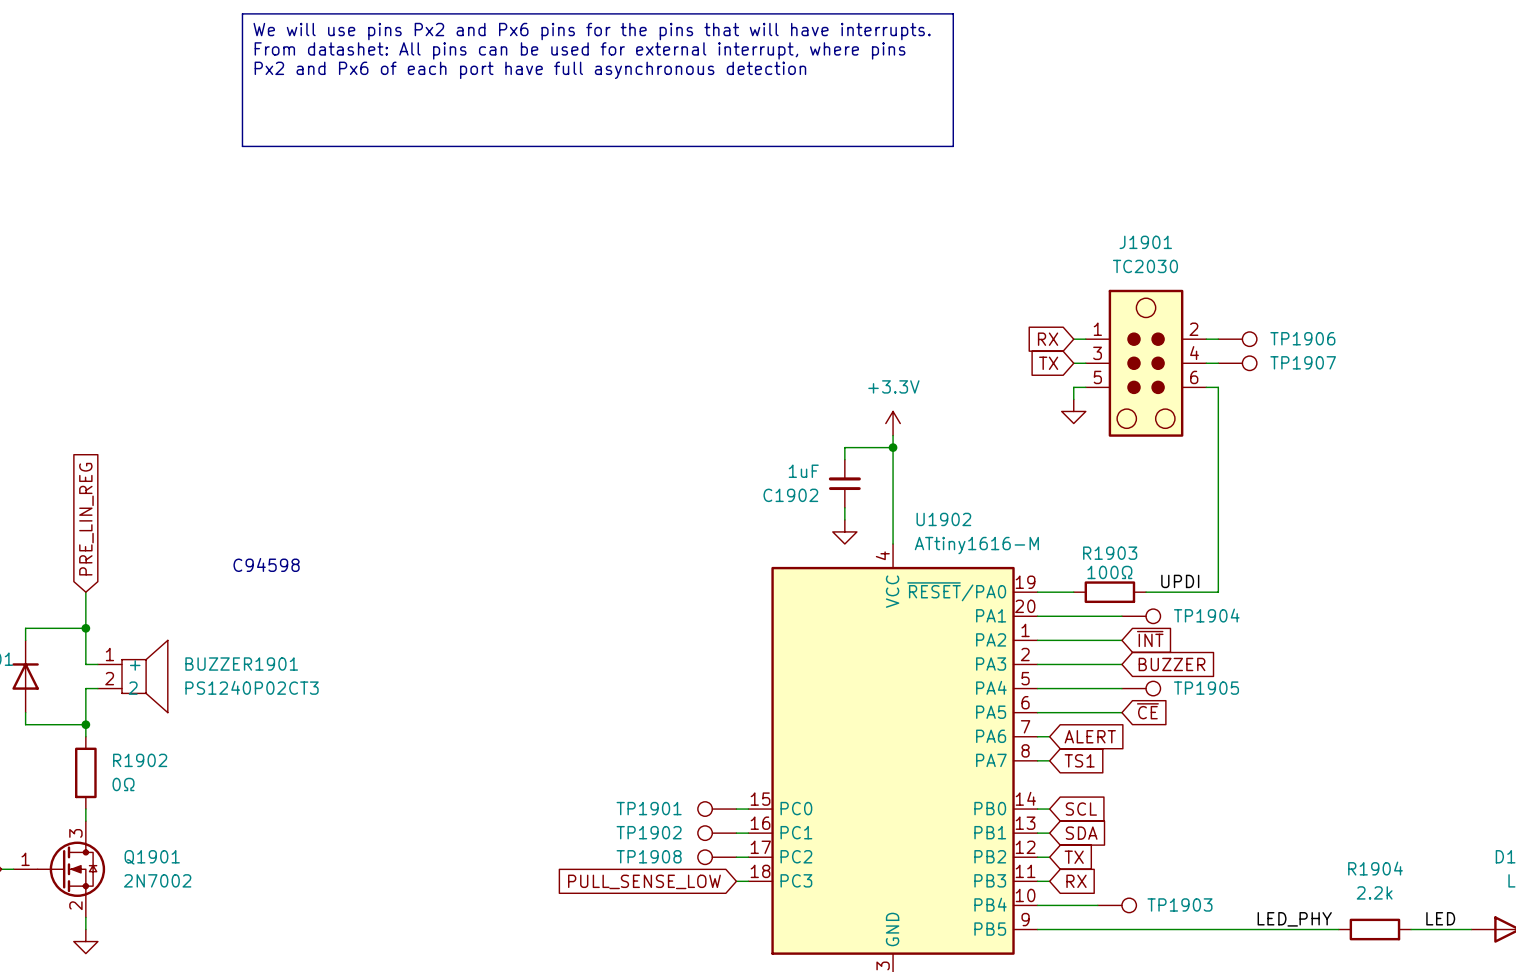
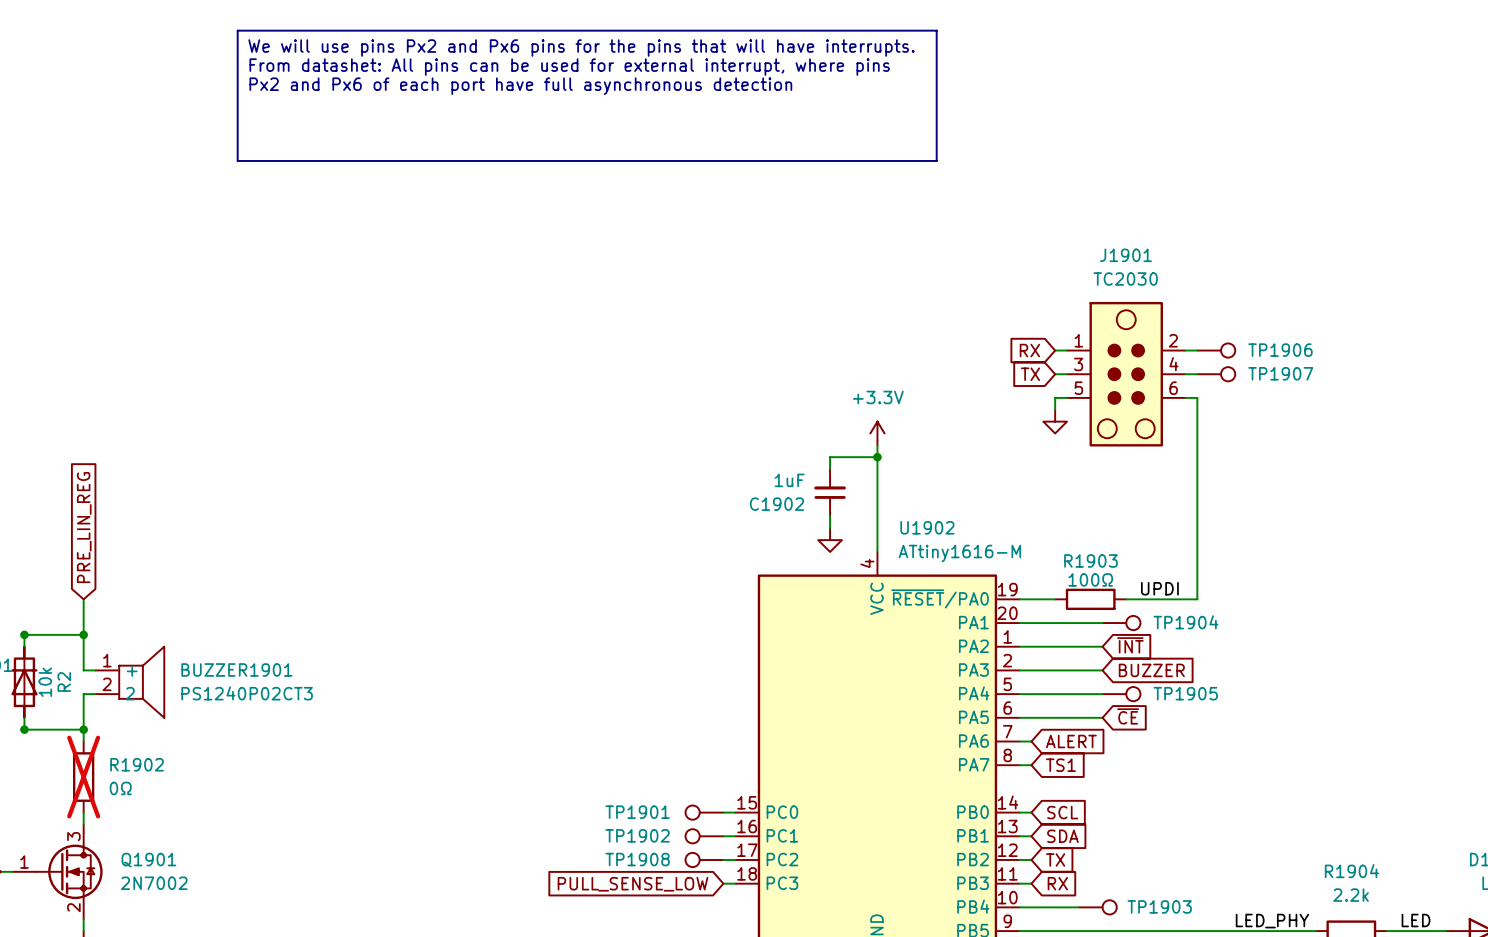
text: C94598 (266, 564) -> none
junction: none -> (24, 634)
R2: none -> 10k (24, 682)
junction: none -> (24, 729)
R1902 do-not-place cross: none -> (83, 777)

